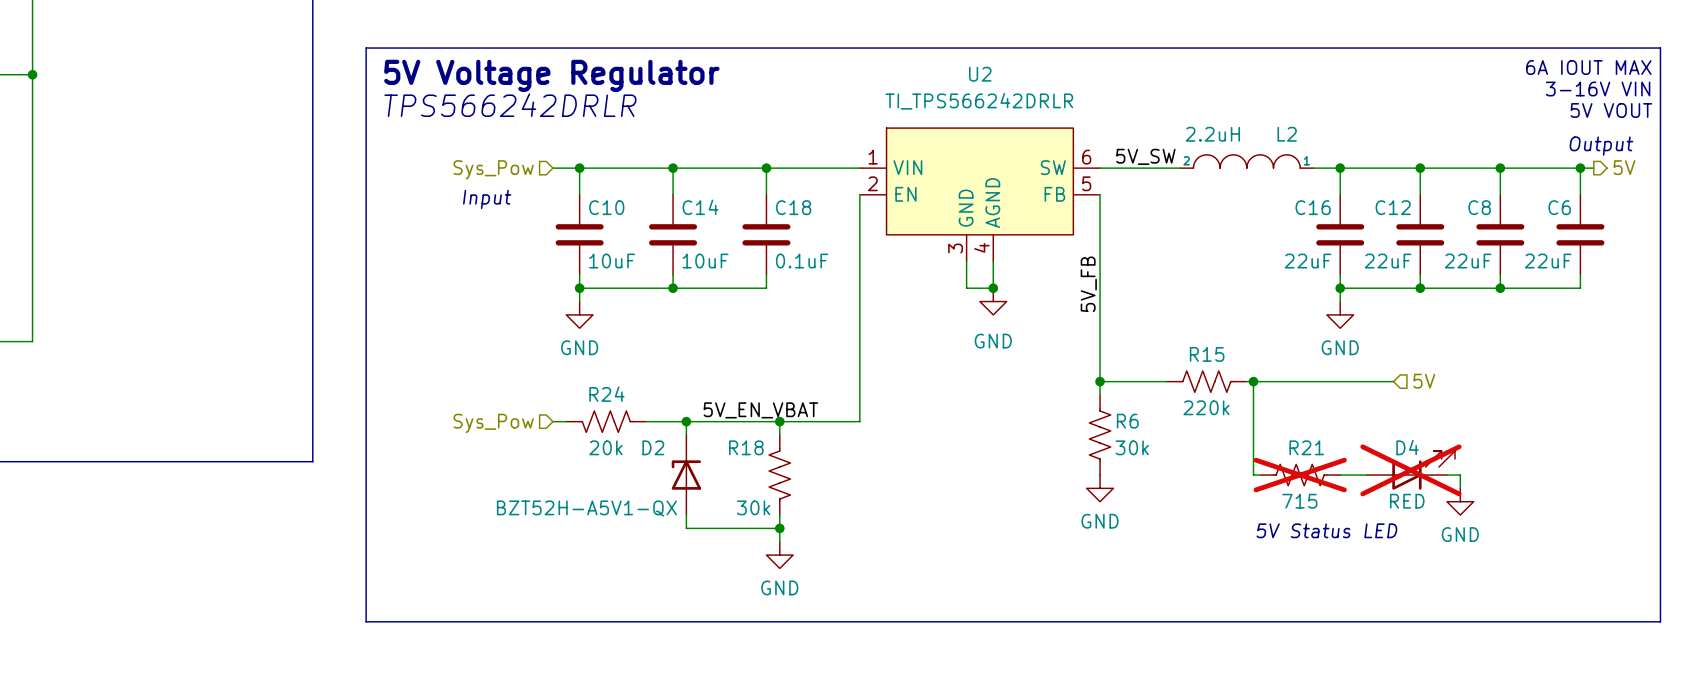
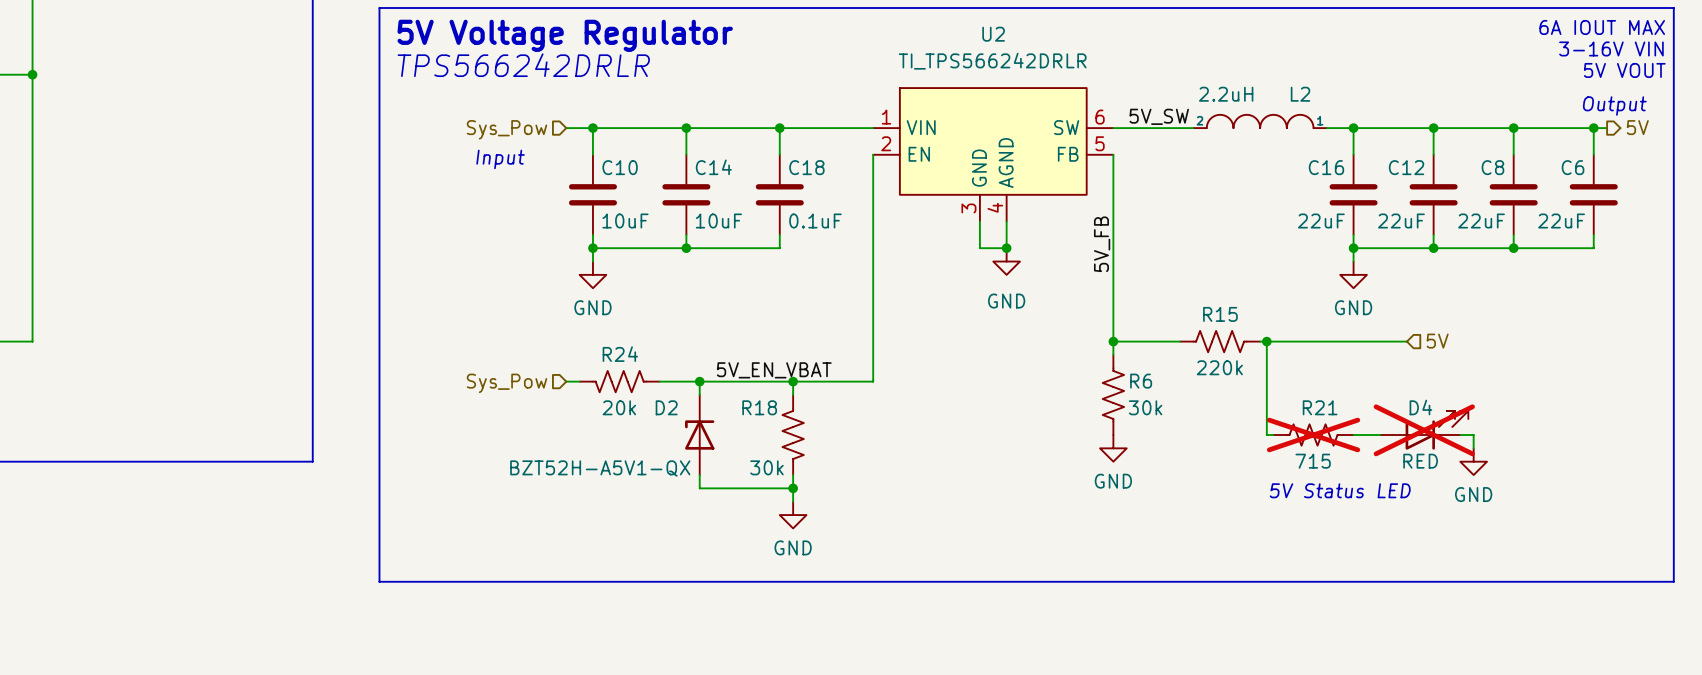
line: (366, 48) (1660, 48) (1660, 621) (366, 621) (366, 48) -> (379, 8) (1673, 8) (1673, 581) (379, 581) (379, 8)
text position: 6A IOUT MAX (1588, 67) -> 6A IOUT MAX (1602, 27)
text position: 5V Voltage Regulator (551, 75) -> 5V Voltage Regulator (565, 35)
text position: 3-16V VIN (1598, 89) -> 3-16V VIN (1611, 48)
text position: TPS566242DRLR (510, 105) -> TPS566242DRLR (523, 65)
text position: 5V VOUT (1611, 110) -> 5V VOUT (1624, 70)
junction: none -> (592, 128)
junction: none -> (686, 128)
junction: none -> (1353, 128)
junction: none -> (1433, 128)
junction: none -> (1513, 128)
junction: none -> (1593, 128)
text position: Output (1601, 146) -> Output (1614, 106)
label position: 5V_SW (1145, 156) -> 5V_SW (1159, 116)
L2 position: (1246, 161) -> (1260, 121)
hierarchical label position: 5V (1624, 167) -> 5V (1637, 127)
wire: (552, 168) (859, 168) -> (566, 128) (873, 128)
wire: (579, 168) (579, 194) -> (592, 128) (592, 154)
junction: (579, 168) -> none
wire: (673, 168) (673, 194) -> (686, 128) (686, 154)
junction: (673, 168) -> none
wire: (766, 168) (766, 194) -> (779, 128) (779, 154)
junction position: (766, 168) -> (779, 128)
wire: (1100, 168) (1180, 168) -> (1113, 128) (1193, 128)
wire: (1313, 168) (1593, 168) -> (1326, 128) (1607, 128)
wire: (1340, 168) (1340, 194) -> (1353, 128) (1353, 154)
junction: (1340, 168) -> none
wire: (1420, 168) (1420, 194) -> (1433, 128) (1433, 154)
junction: (1420, 168) -> none
wire: (1500, 168) (1500, 194) -> (1513, 128) (1513, 154)
junction: (1500, 168) -> none
wire: (1580, 168) (1580, 194) -> (1593, 128) (1593, 154)
junction: (1580, 168) -> none
hierarchical label position: Sys_Pow (493, 169) -> Sys_Pow (506, 129)
wire: (859, 194) (859, 421) (646, 421) -> (873, 154) (873, 381) (659, 381)
U2 position: (979, 194) -> (993, 154)
wire: (1100, 194) (1100, 394) -> (1113, 154) (1113, 354)
text position: Input (487, 199) -> Input (500, 159)
C10 position: (579, 234) -> (592, 194)
C14 position: (673, 234) -> (686, 194)
C18 position: (766, 234) -> (779, 194)
C16 position: (1340, 234) -> (1353, 194)
C12 position: (1420, 234) -> (1433, 194)
C8 position: (1500, 234) -> (1513, 194)
C6 position: (1580, 234) -> (1593, 194)
junction: none -> (592, 248)
junction: none -> (686, 248)
junction: none -> (1353, 248)
junction: none -> (1433, 248)
junction: none -> (1513, 248)
wire: (966, 261) (966, 288) (993, 288) (993, 261) -> (979, 221) (979, 248) (1006, 248) (1006, 221)
wire: (579, 274) (579, 301) -> (592, 234) (592, 261)
wire: (673, 274) (673, 288) -> (686, 234) (686, 248)
wire: (766, 274) (766, 288) (579, 288) -> (779, 234) (779, 248) (592, 248)
wire: (1340, 274) (1340, 301) -> (1353, 234) (1353, 261)
wire: (1420, 274) (1420, 288) -> (1433, 234) (1433, 248)
wire: (1500, 274) (1500, 288) -> (1513, 234) (1513, 248)
wire: (1580, 274) (1580, 288) (1340, 288) -> (1593, 234) (1593, 248) (1353, 248)
label position: 5V_FB (1088, 284) -> 5V_FB (1102, 244)
junction: (579, 288) -> none
junction: (673, 288) -> none
junction position: (993, 288) -> (1006, 248)
junction: (1340, 288) -> none
junction: (1420, 288) -> none
junction: (1500, 288) -> none
power symbol position: GND (993, 301) -> GND (1006, 261)
power symbol position: GND (579, 314) -> GND (592, 274)
power symbol position: GND (1340, 314) -> GND (1353, 274)
junction: none -> (793, 381)
wire: (1100, 381) (1166, 381) -> (1113, 341) (1180, 341)
junction position: (1100, 381) -> (1113, 341)
R15 position: (1206, 381) -> (1220, 341)
wire: (1246, 381) (1393, 381) -> (1260, 341) (1406, 341)
wire: (1253, 381) (1253, 475) (1260, 475) -> (1266, 341) (1266, 435) (1273, 435)
junction position: (1253, 381) -> (1266, 341)
hierarchical label position: 5V (1424, 381) -> 5V (1437, 341)
label position: 5V_EN_VBAT (760, 410) -> 5V_EN_VBAT (774, 370)
wire: (552, 421) (566, 421) -> (566, 381) (579, 381)
R24 position: (606, 421) -> (619, 381)
wire: (686, 421) (686, 435) -> (699, 381) (699, 394)
junction position: (686, 421) -> (699, 381)
wire: (779, 421) (779, 435) -> (793, 381) (793, 394)
junction: (779, 421) -> none
hierarchical label position: Sys_Pow (493, 423) -> Sys_Pow (506, 383)
R6 position: (1100, 435) -> (1113, 394)
D4 position: (1410, 470) -> (1424, 430)
D2 position: (686, 475) -> (699, 435)
R18 position: (779, 475) -> (793, 435)
R21 position: (1300, 475) -> (1313, 435)
wire: (1340, 475) (1366, 475) -> (1353, 435) (1380, 435)
wire: (1446, 475) (1460, 475) (1460, 488) -> (1460, 435) (1473, 435) (1473, 448)
junction: none -> (793, 488)
power symbol position: GND (1100, 488) -> GND (1113, 448)
power symbol position: GND (1460, 501) -> GND (1473, 461)
wire: (686, 515) (686, 528) (779, 528) -> (699, 475) (699, 488) (793, 488)
wire: (779, 515) (779, 541) -> (793, 475) (793, 501)
junction: (779, 528) -> none
text position: 5V Status LED (1326, 530) -> 5V Status LED (1340, 490)
power symbol position: GND (779, 555) -> GND (793, 515)

